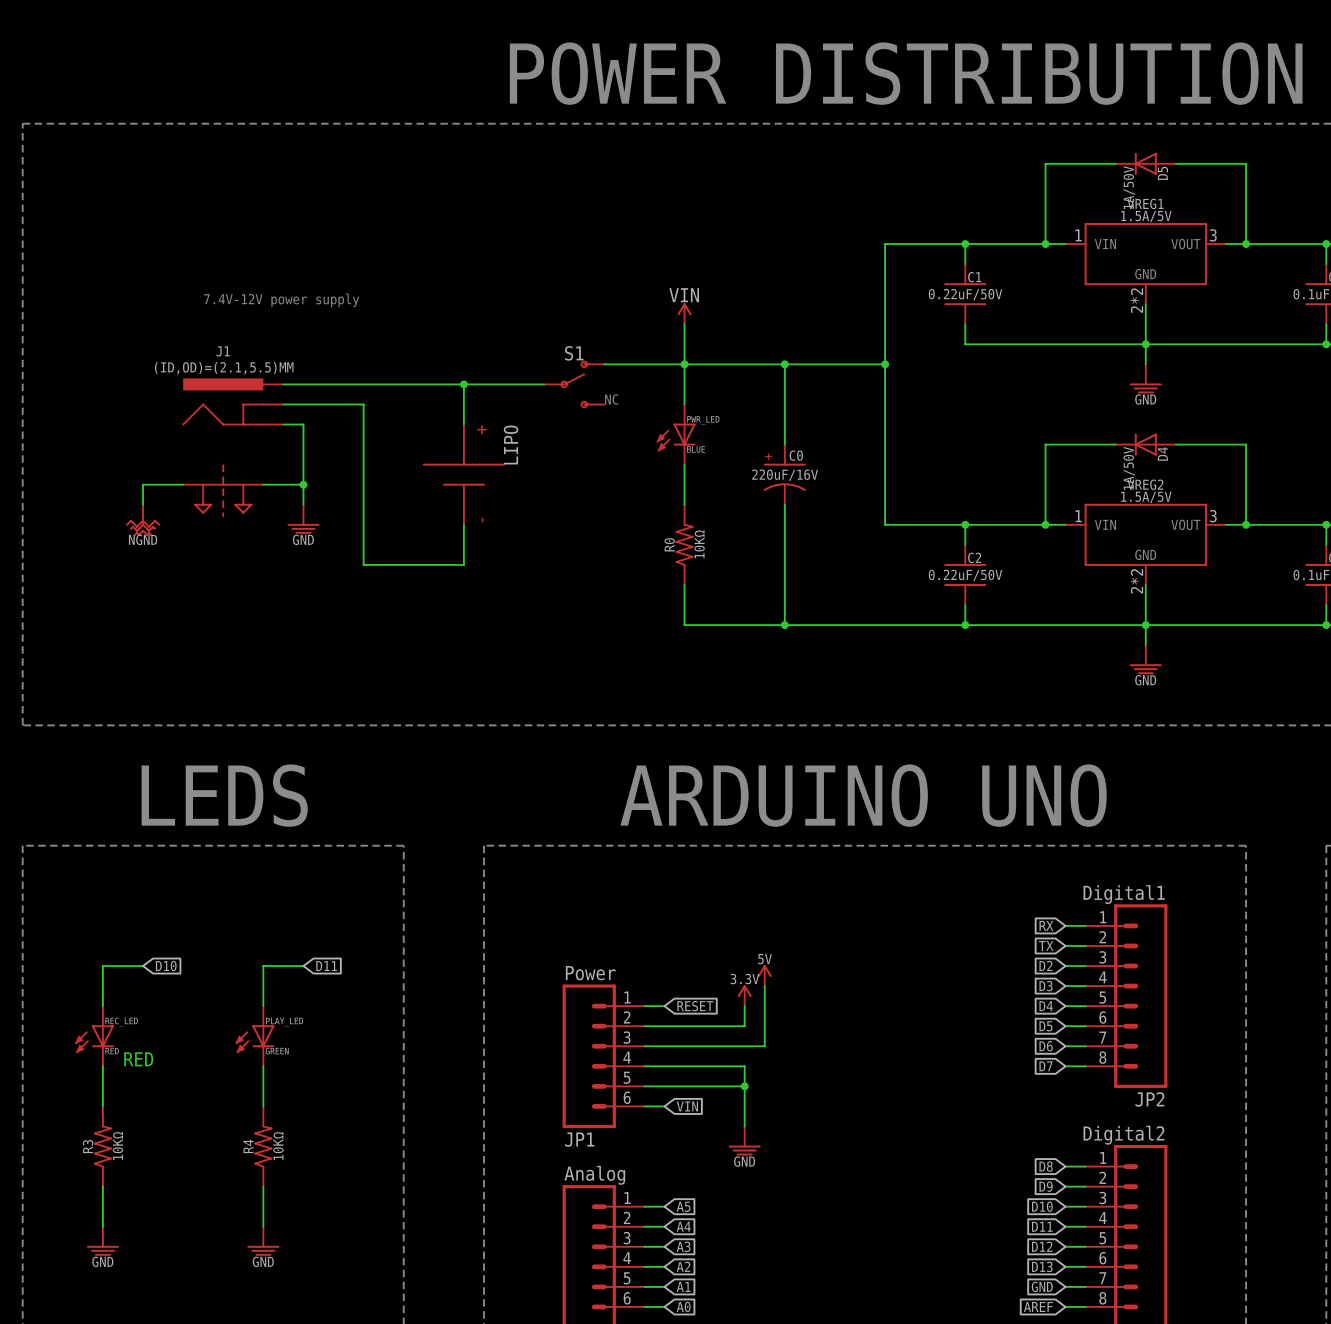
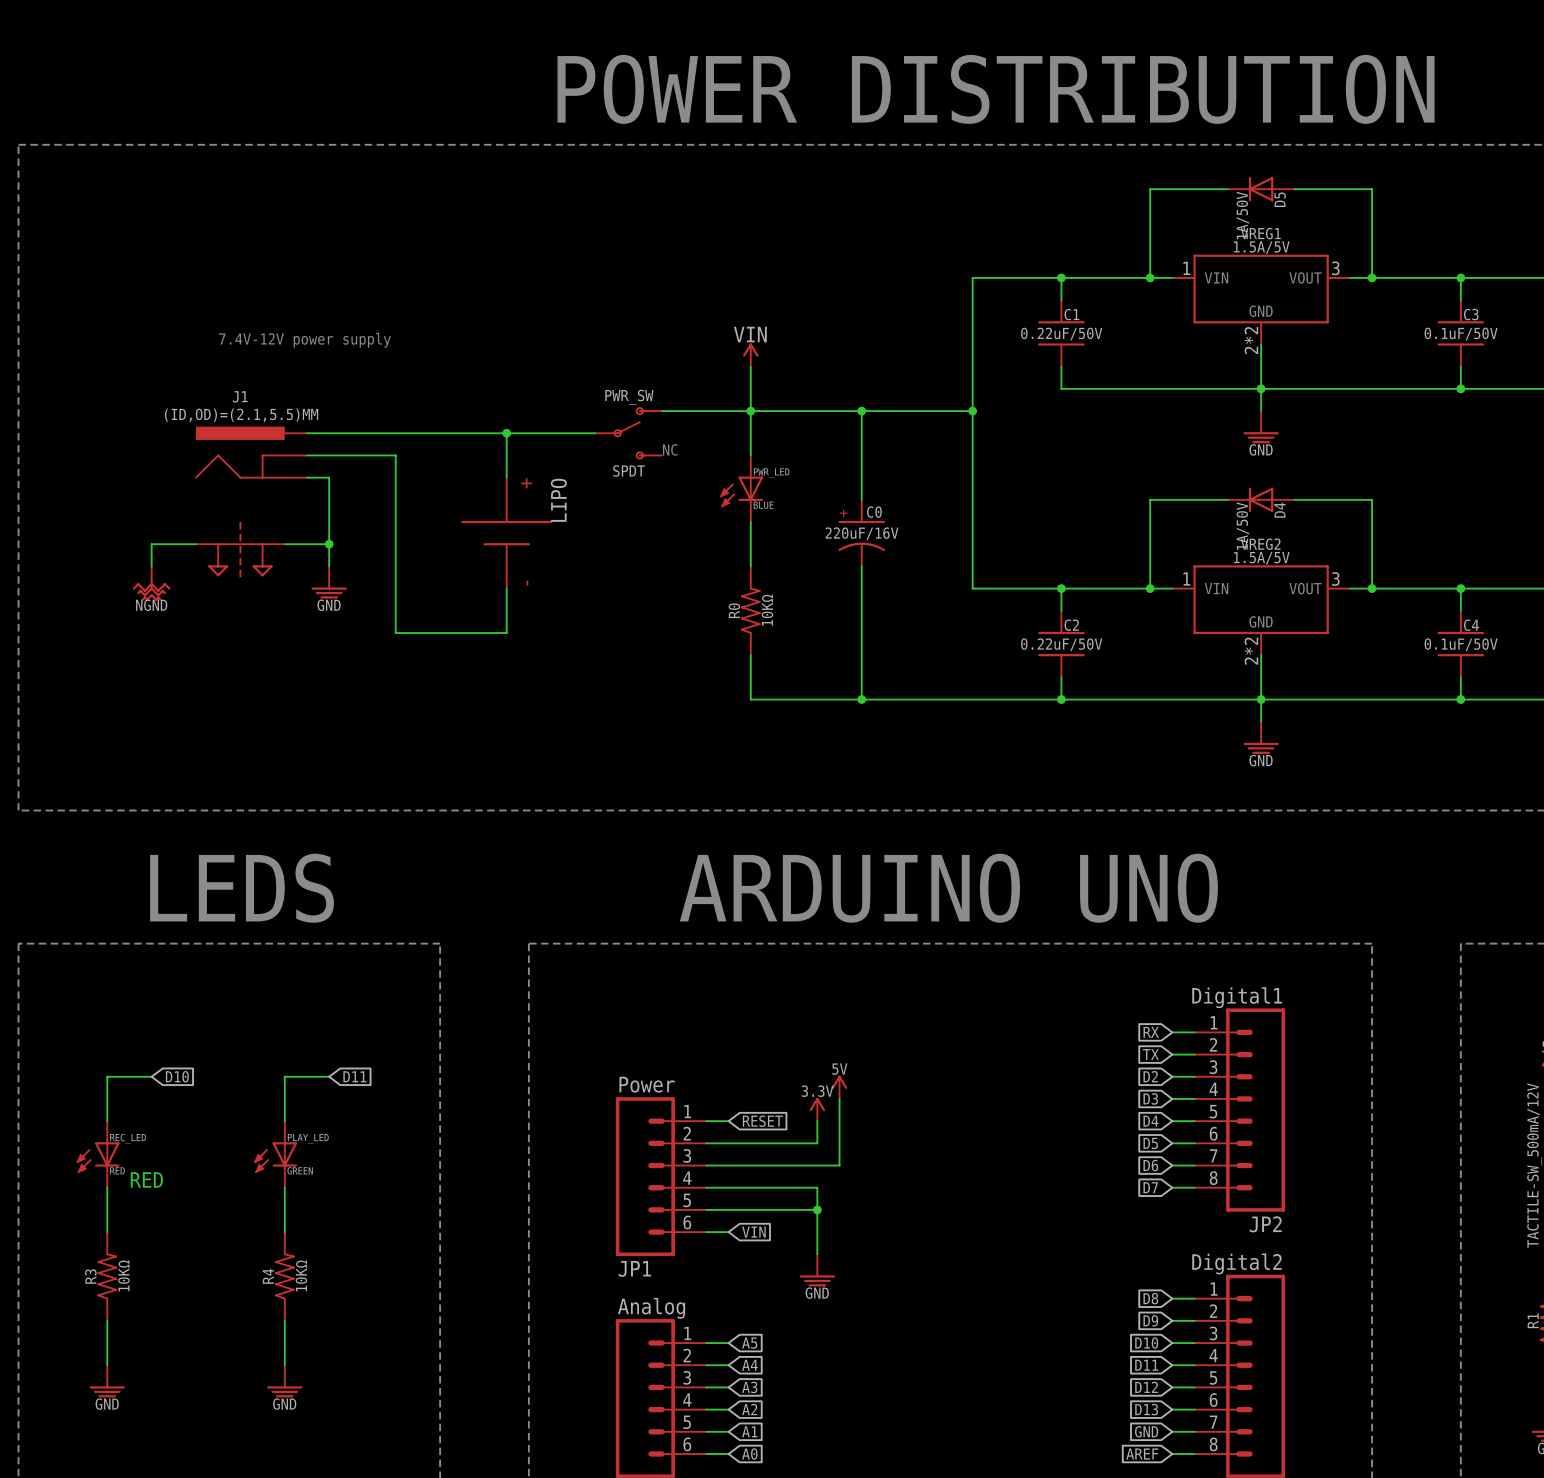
S1 name: S1 (574, 353) -> PWR_SW (629, 397)
S1 value: none -> SPDT (629, 471)

